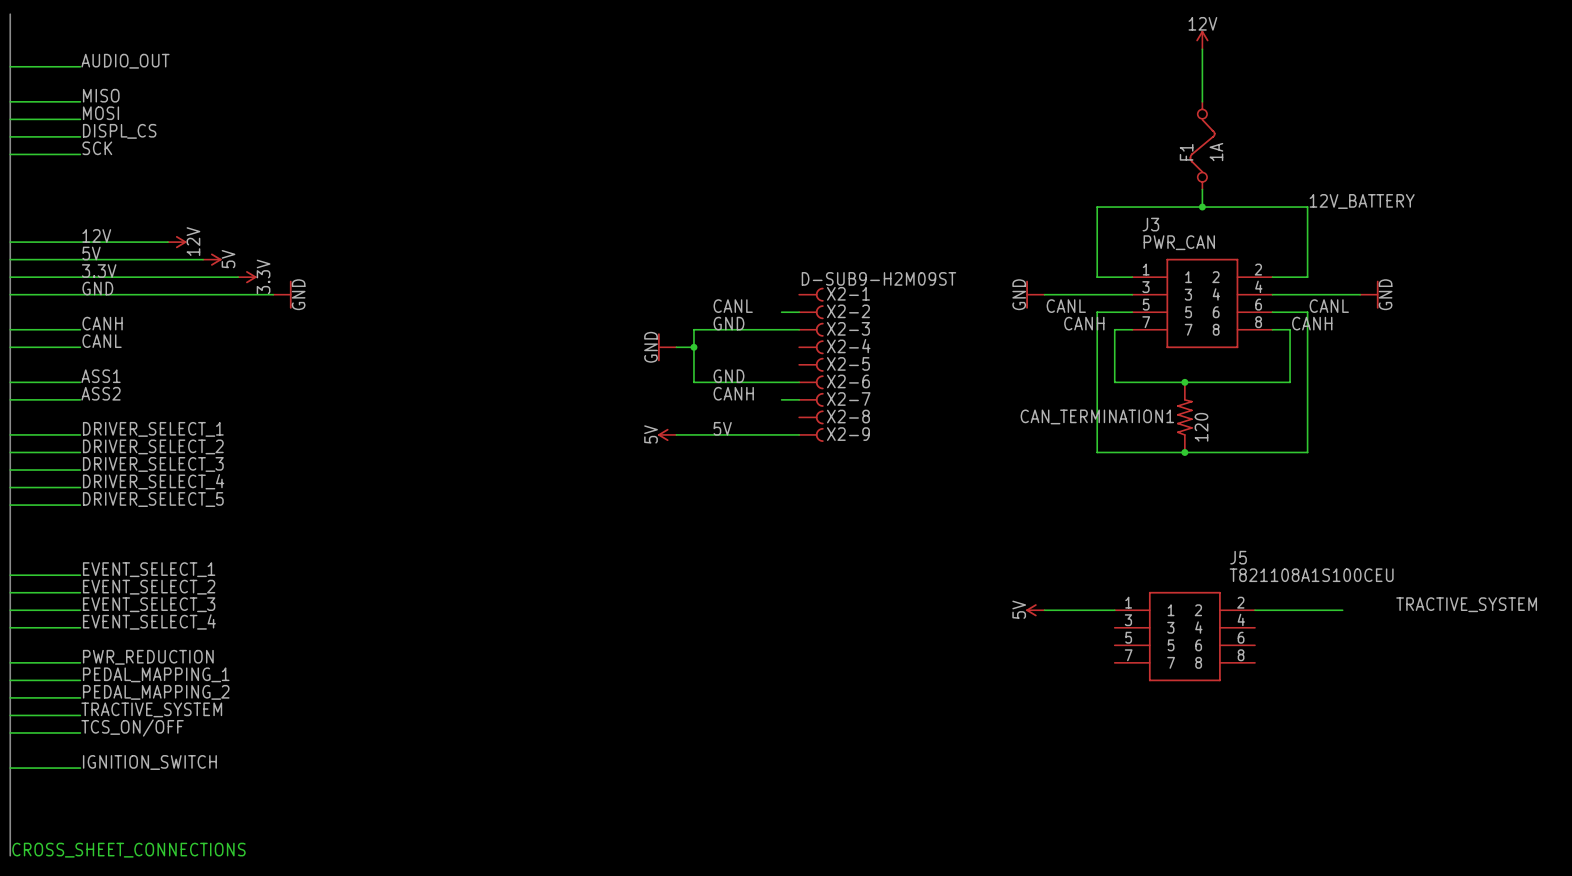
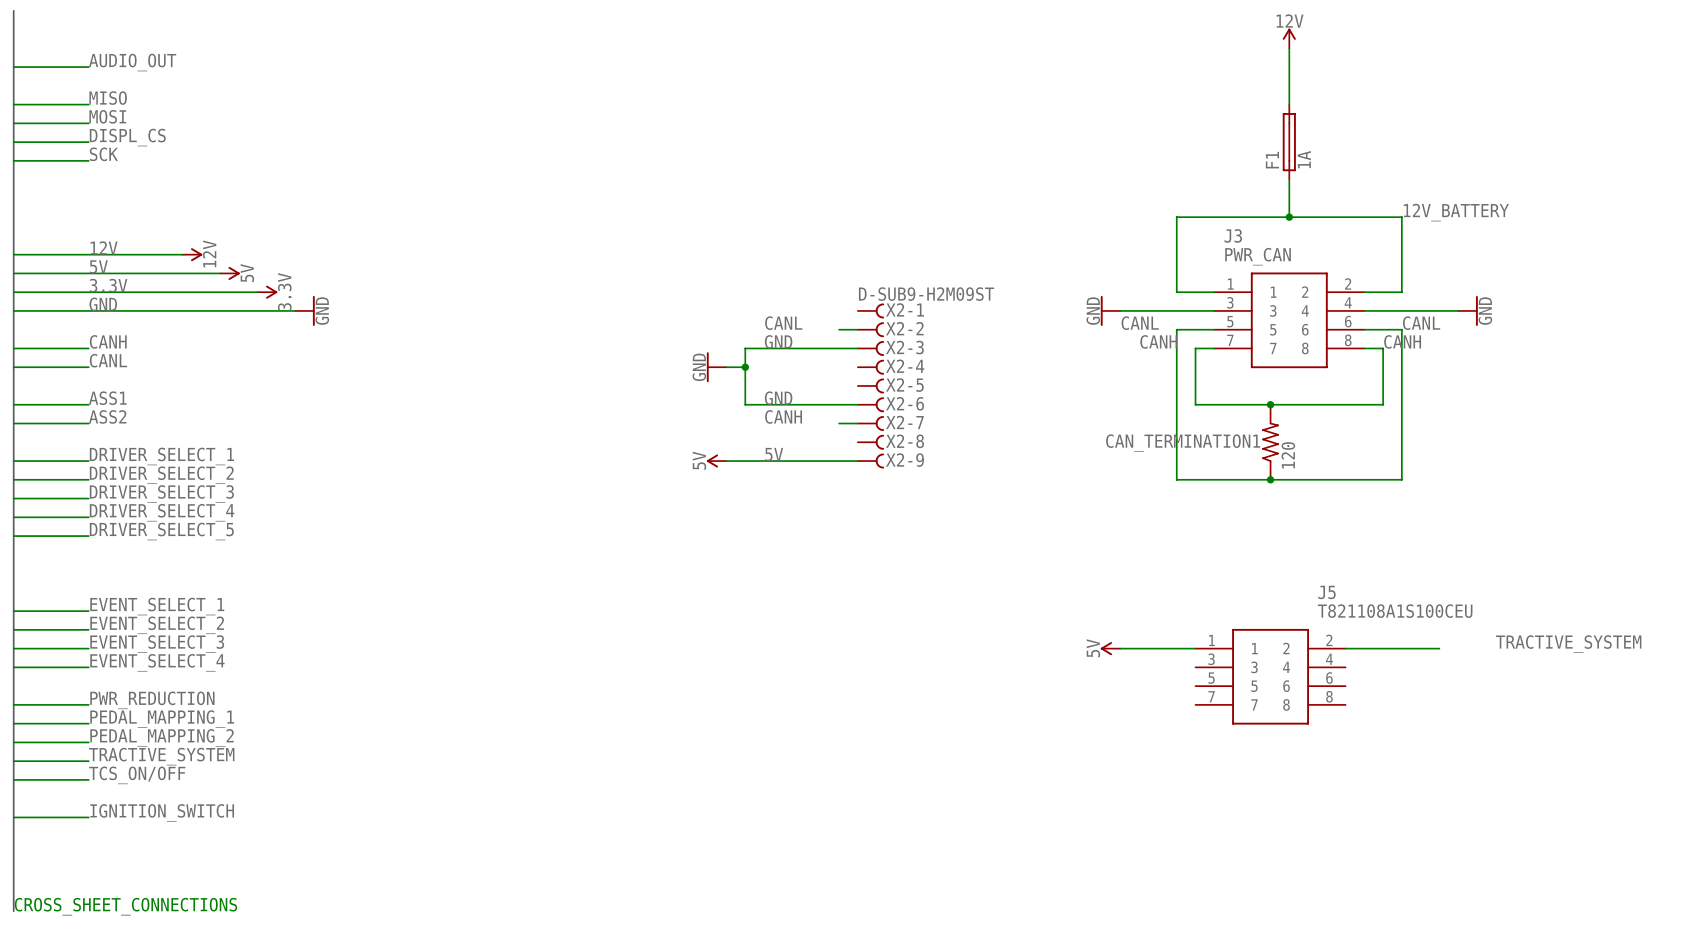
F1 symbol: [1189, 101, 1216, 190] -> [1282, 104, 1296, 180]

